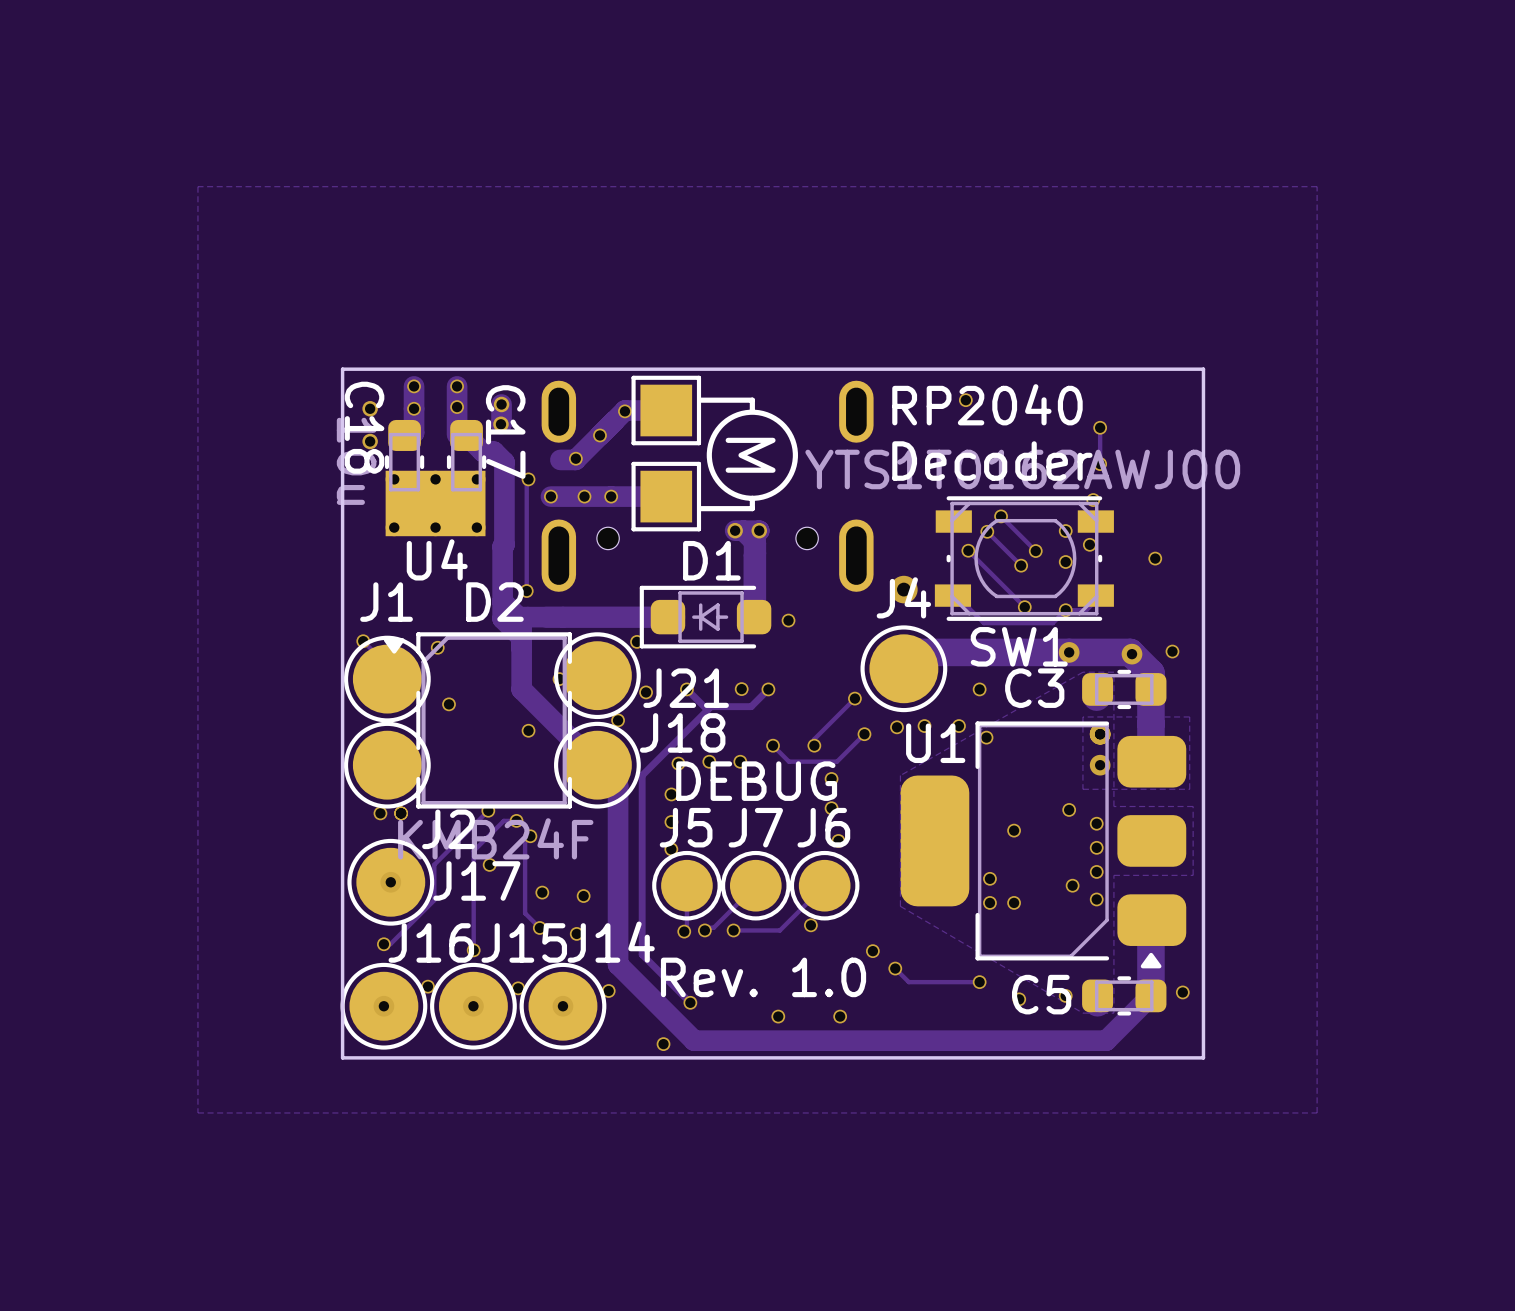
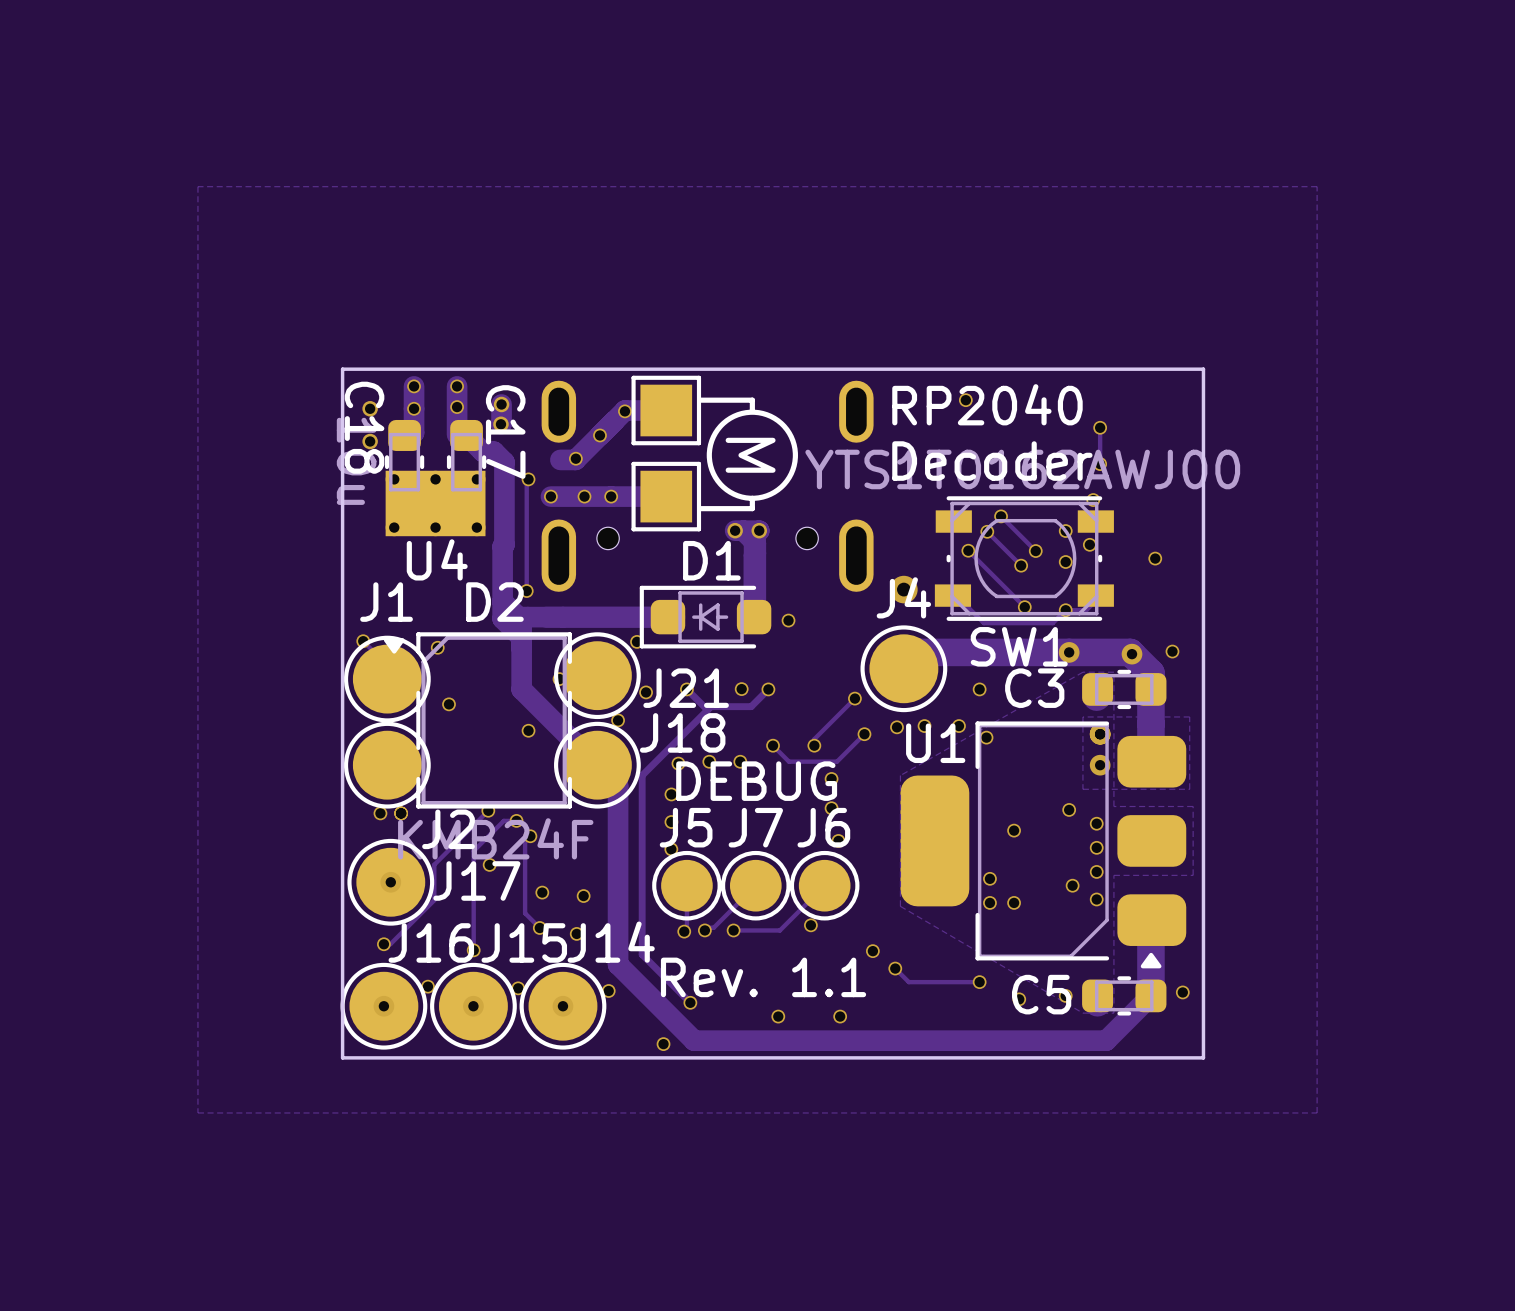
text: Rev. 1.0 (763, 977) -> Rev. 1.1 (763, 977)

